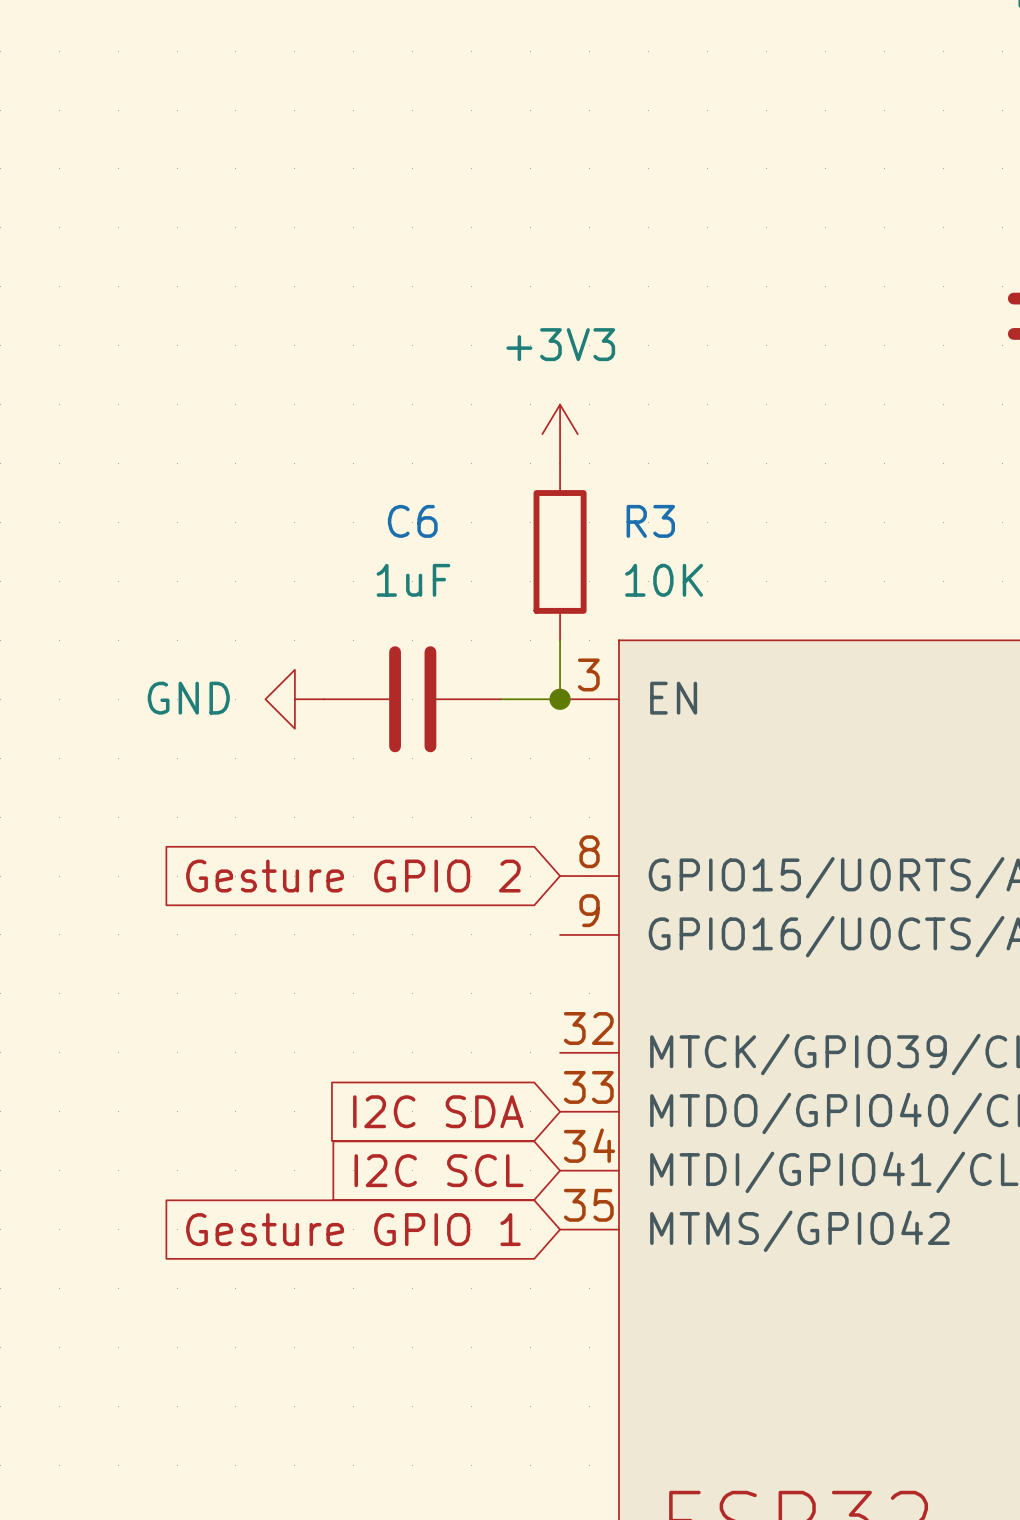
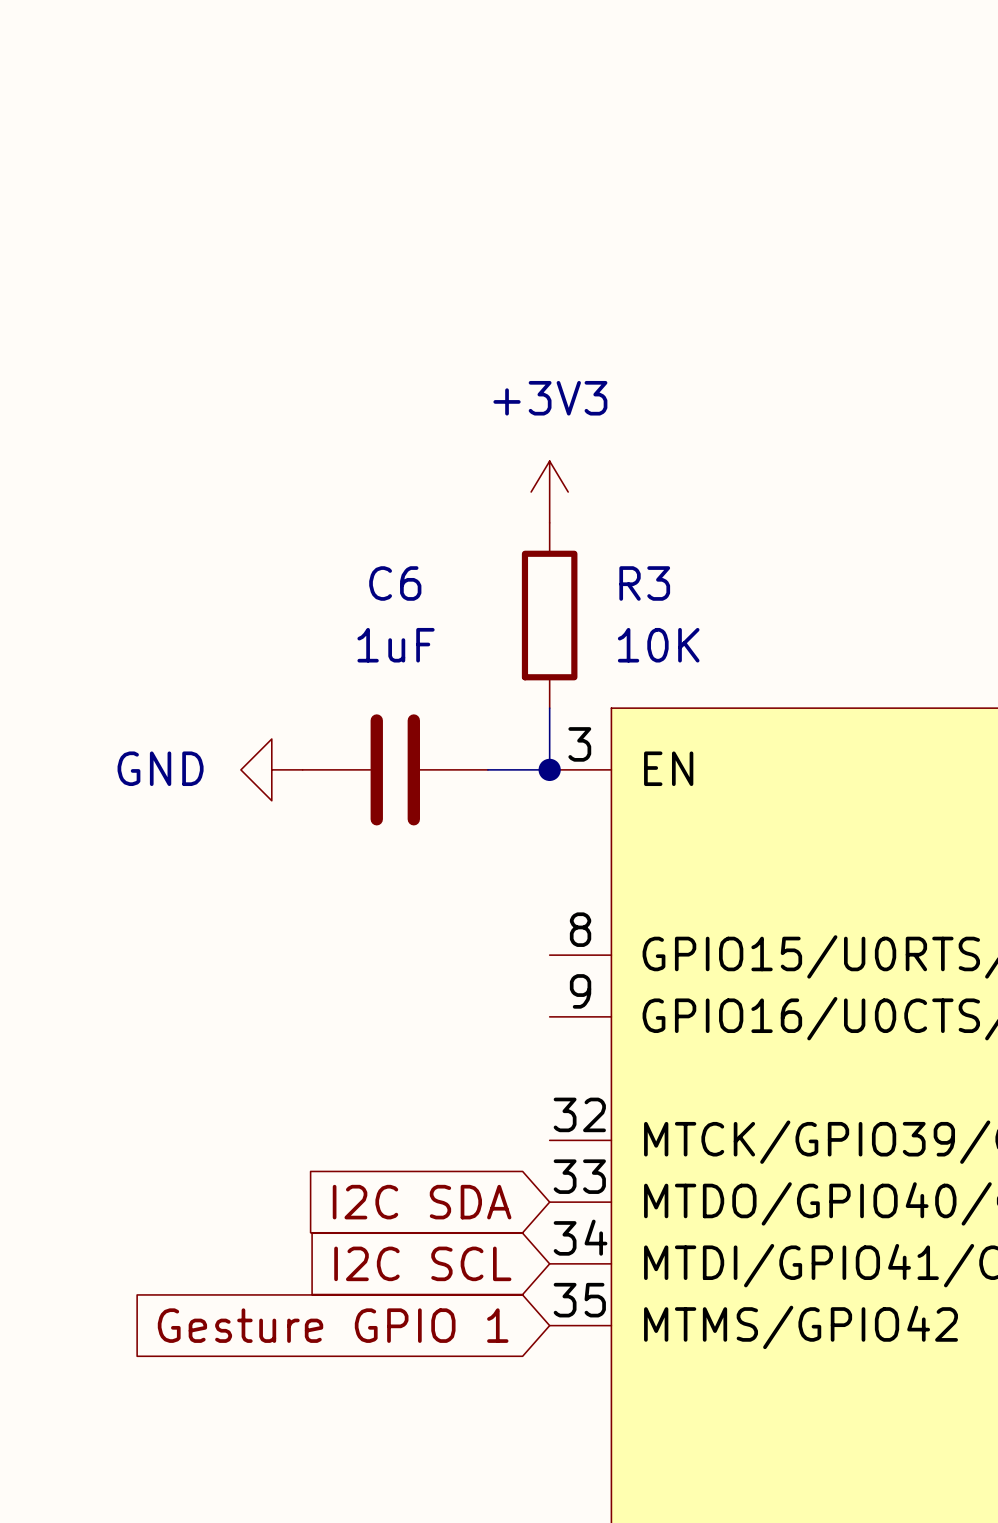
global label: Gesture GPIO 2 (353, 876) -> none

